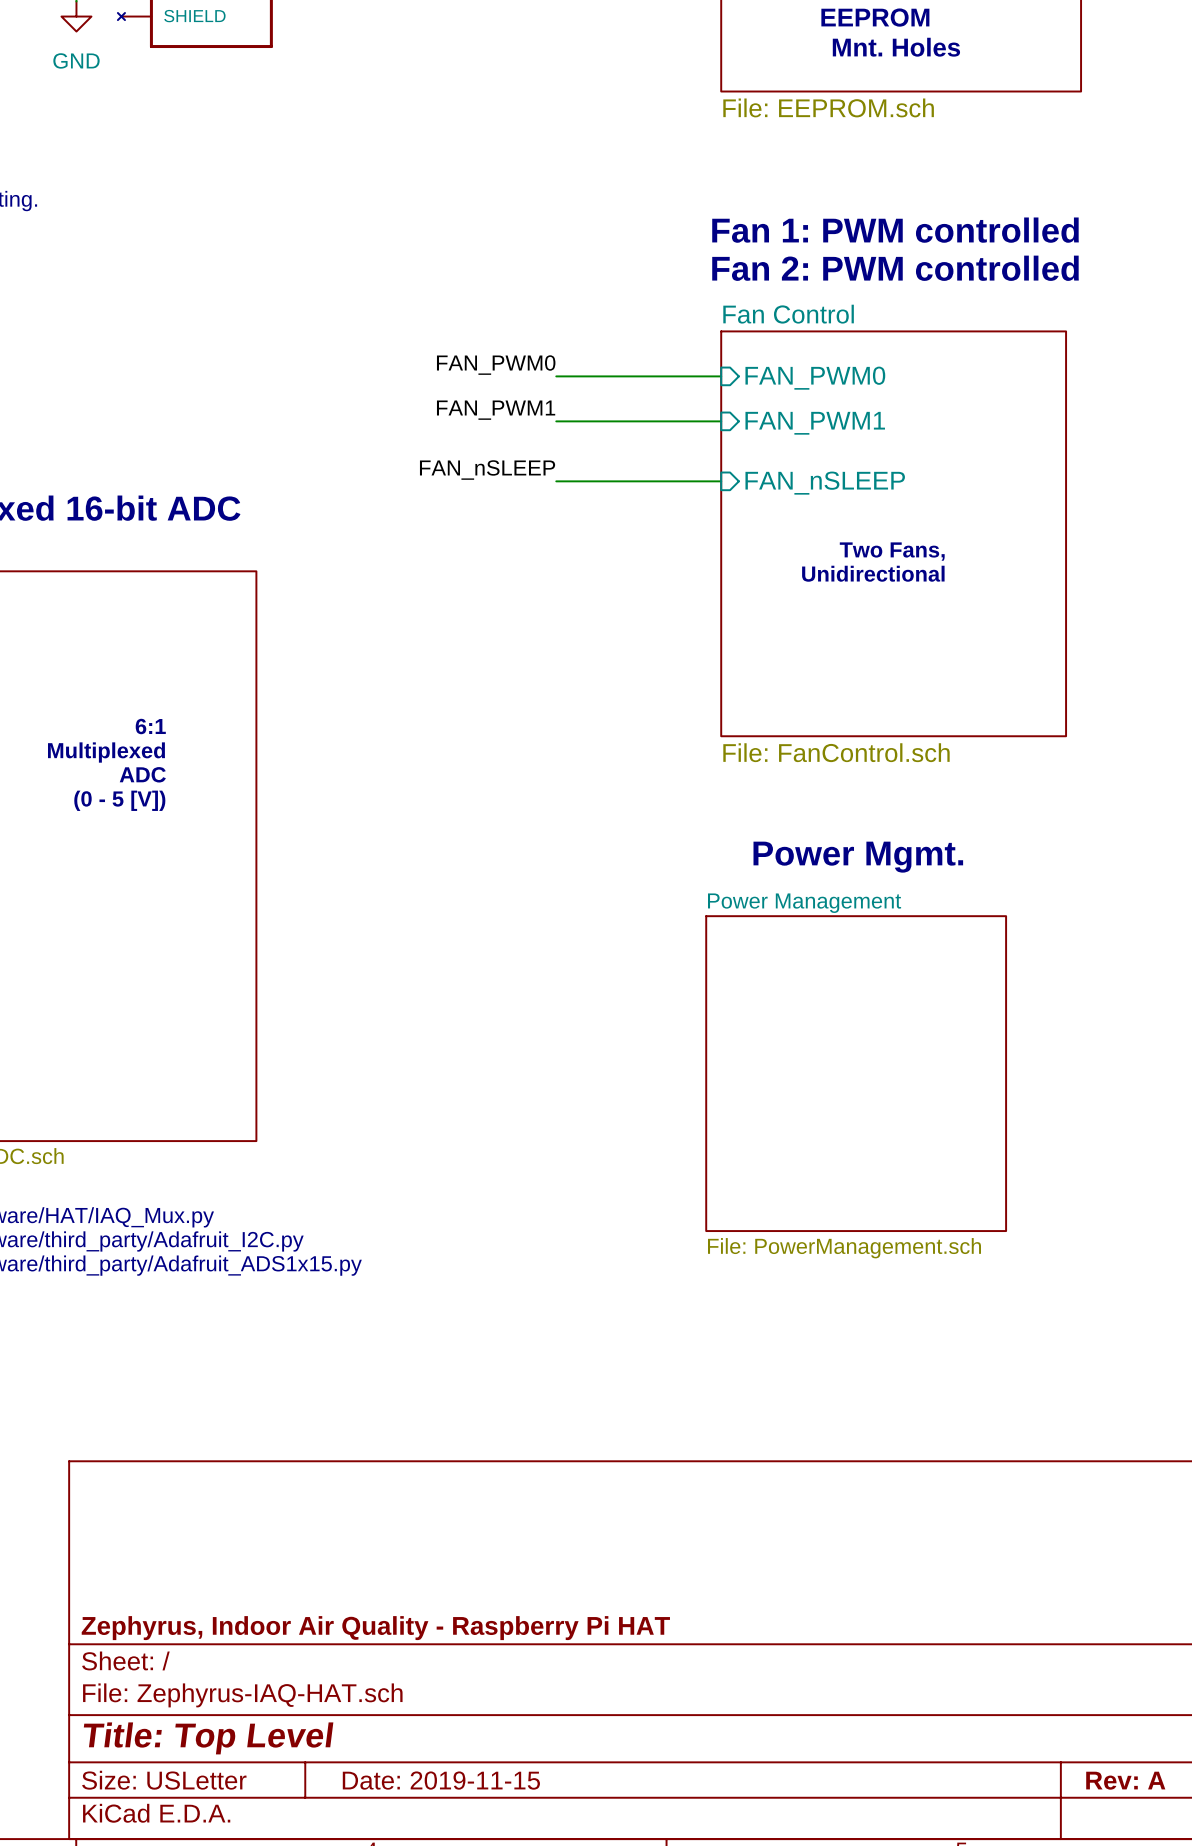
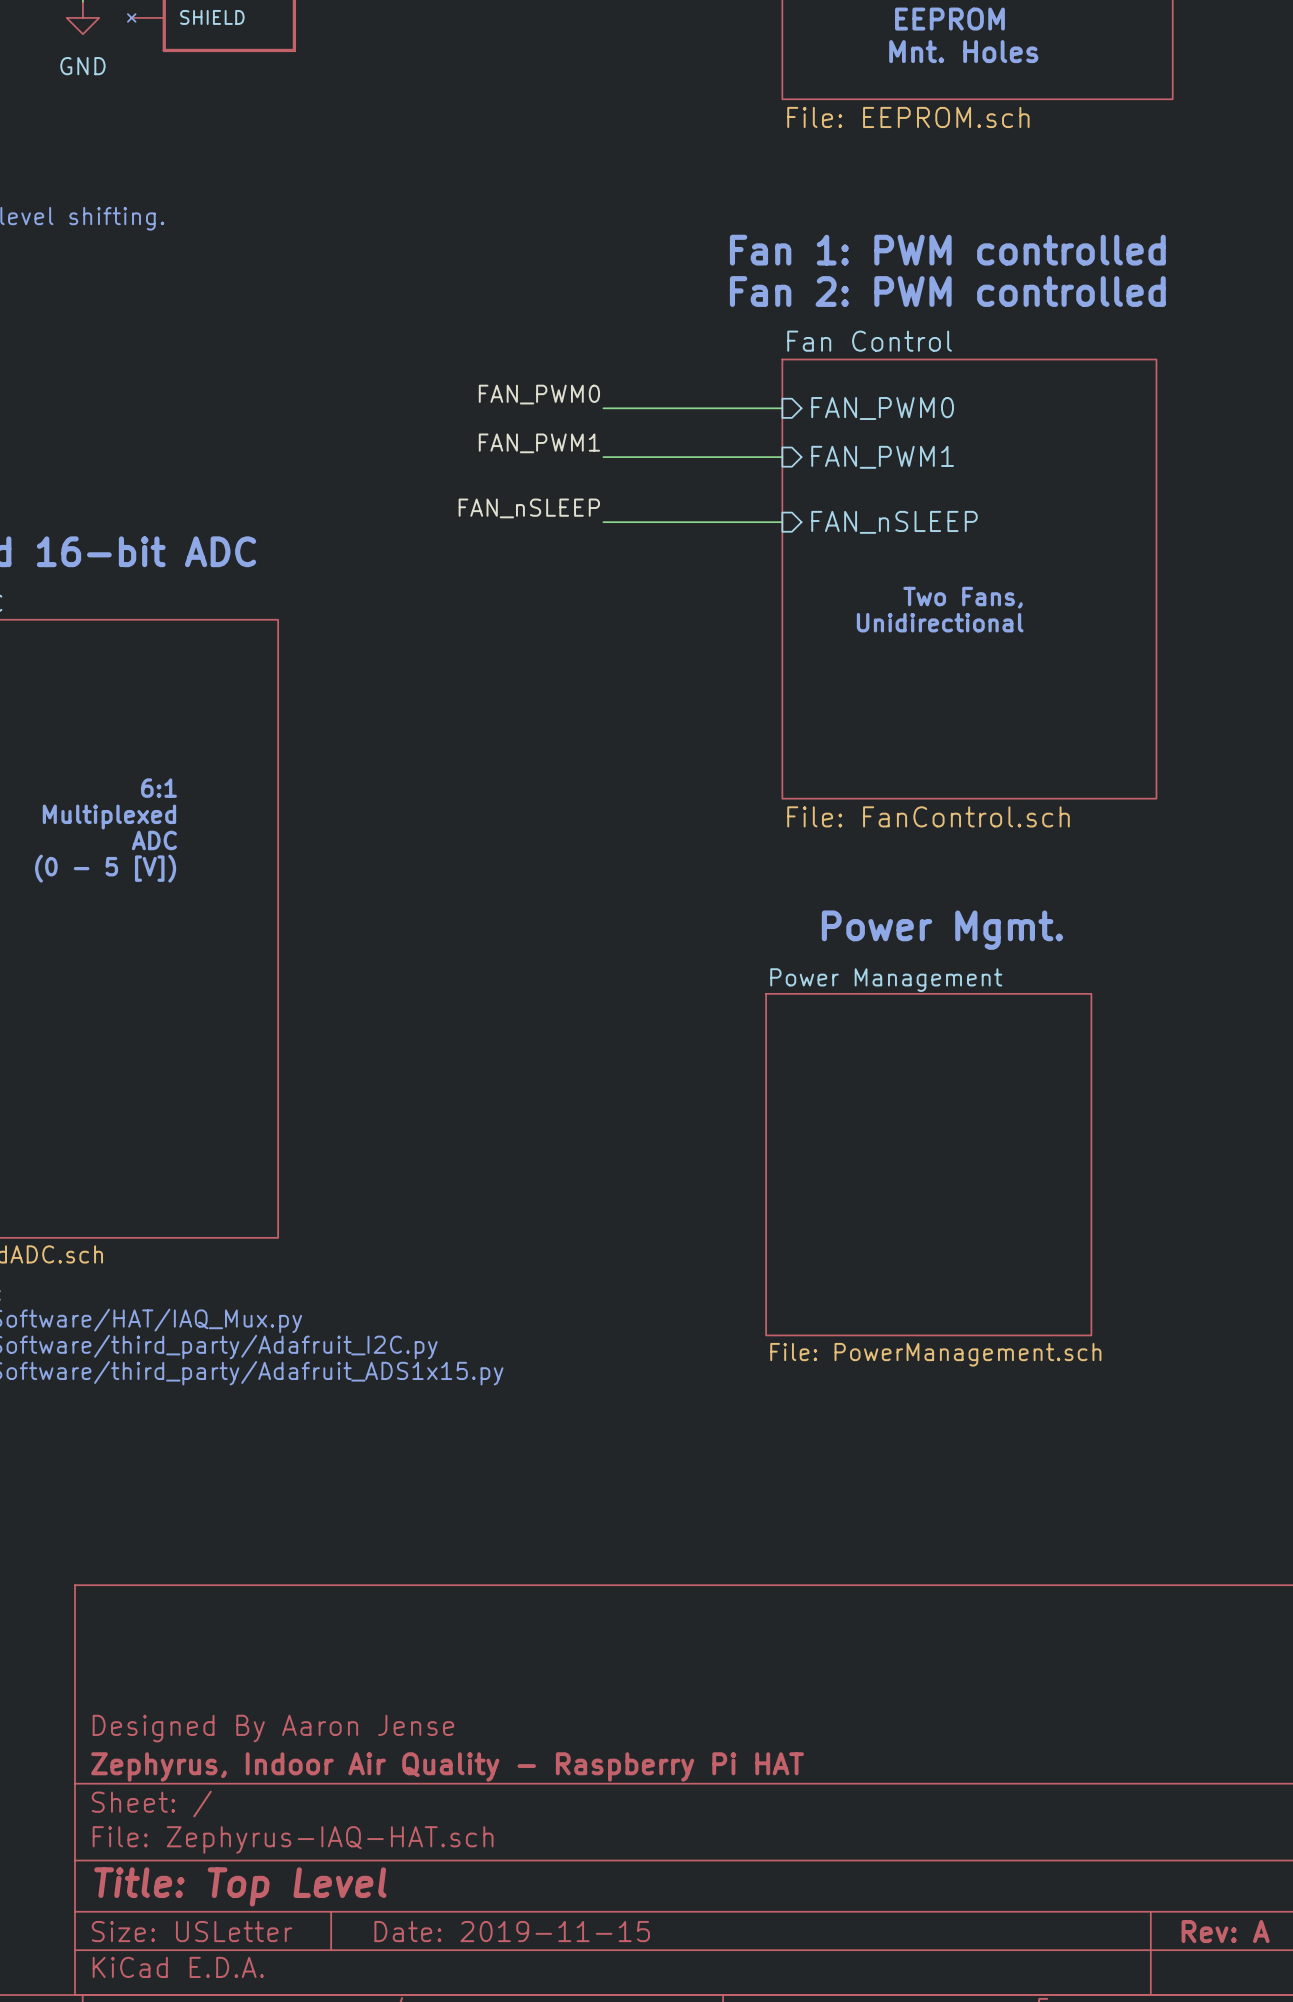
title block: none -> Designed By Aaron Jense (273, 1728)

